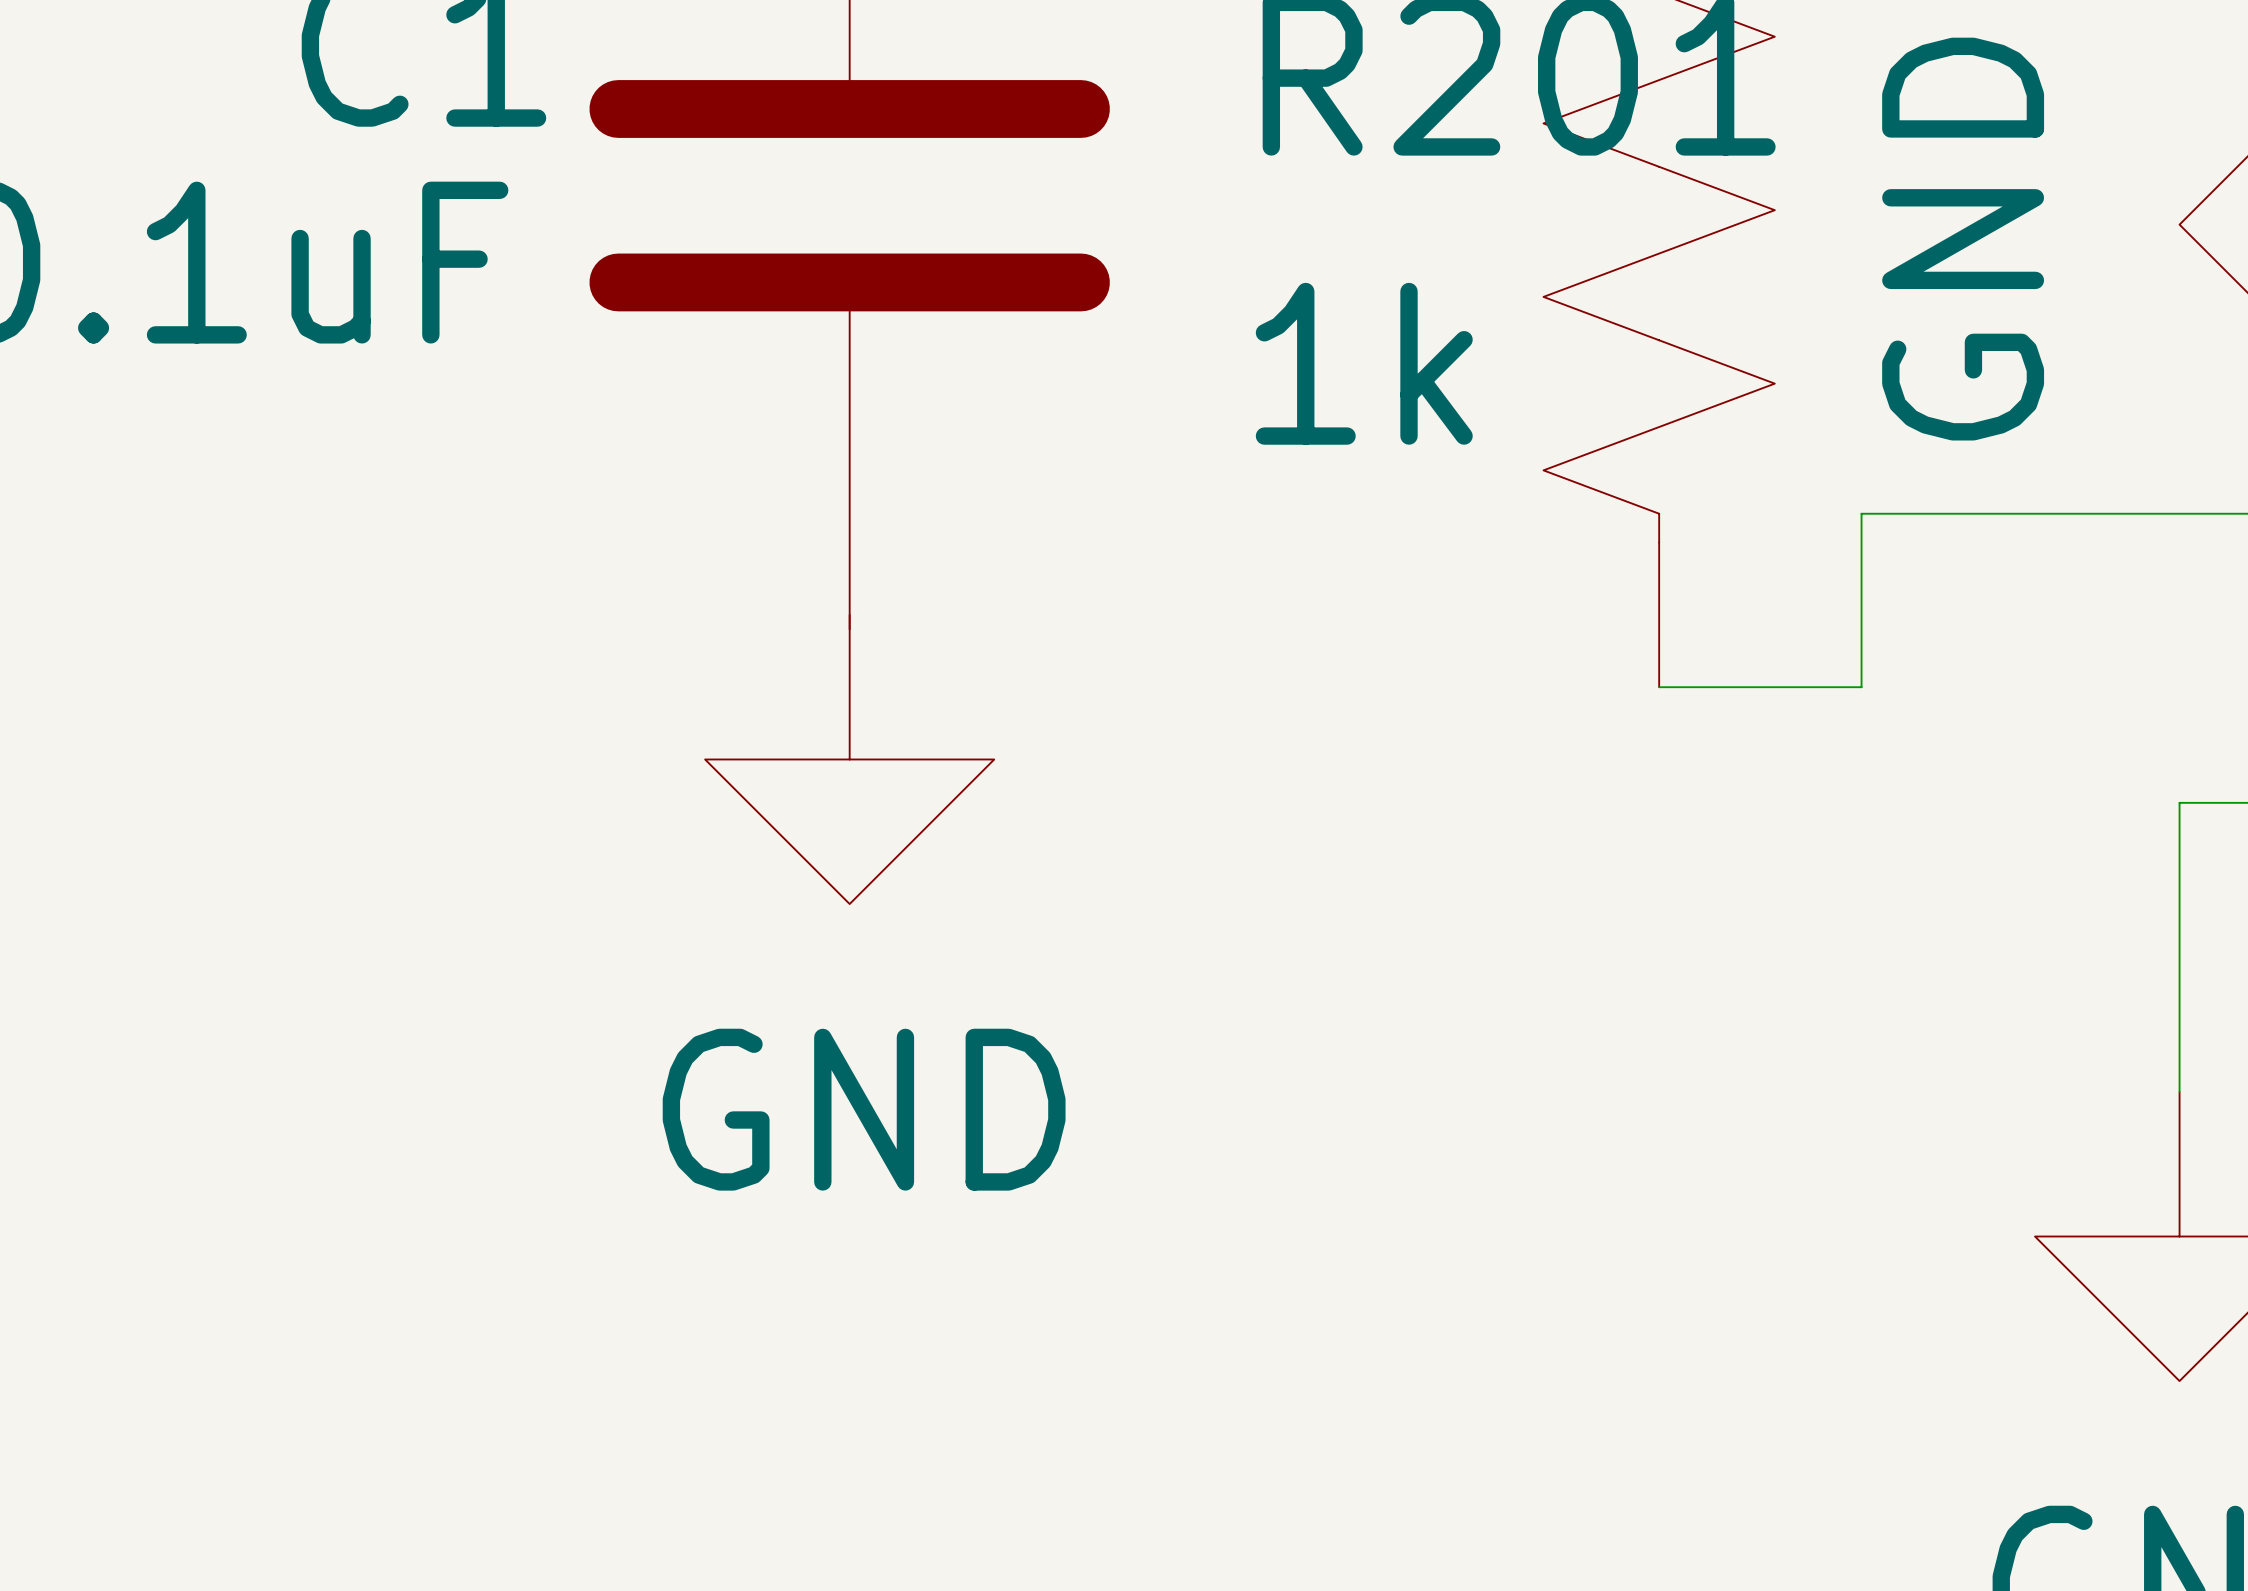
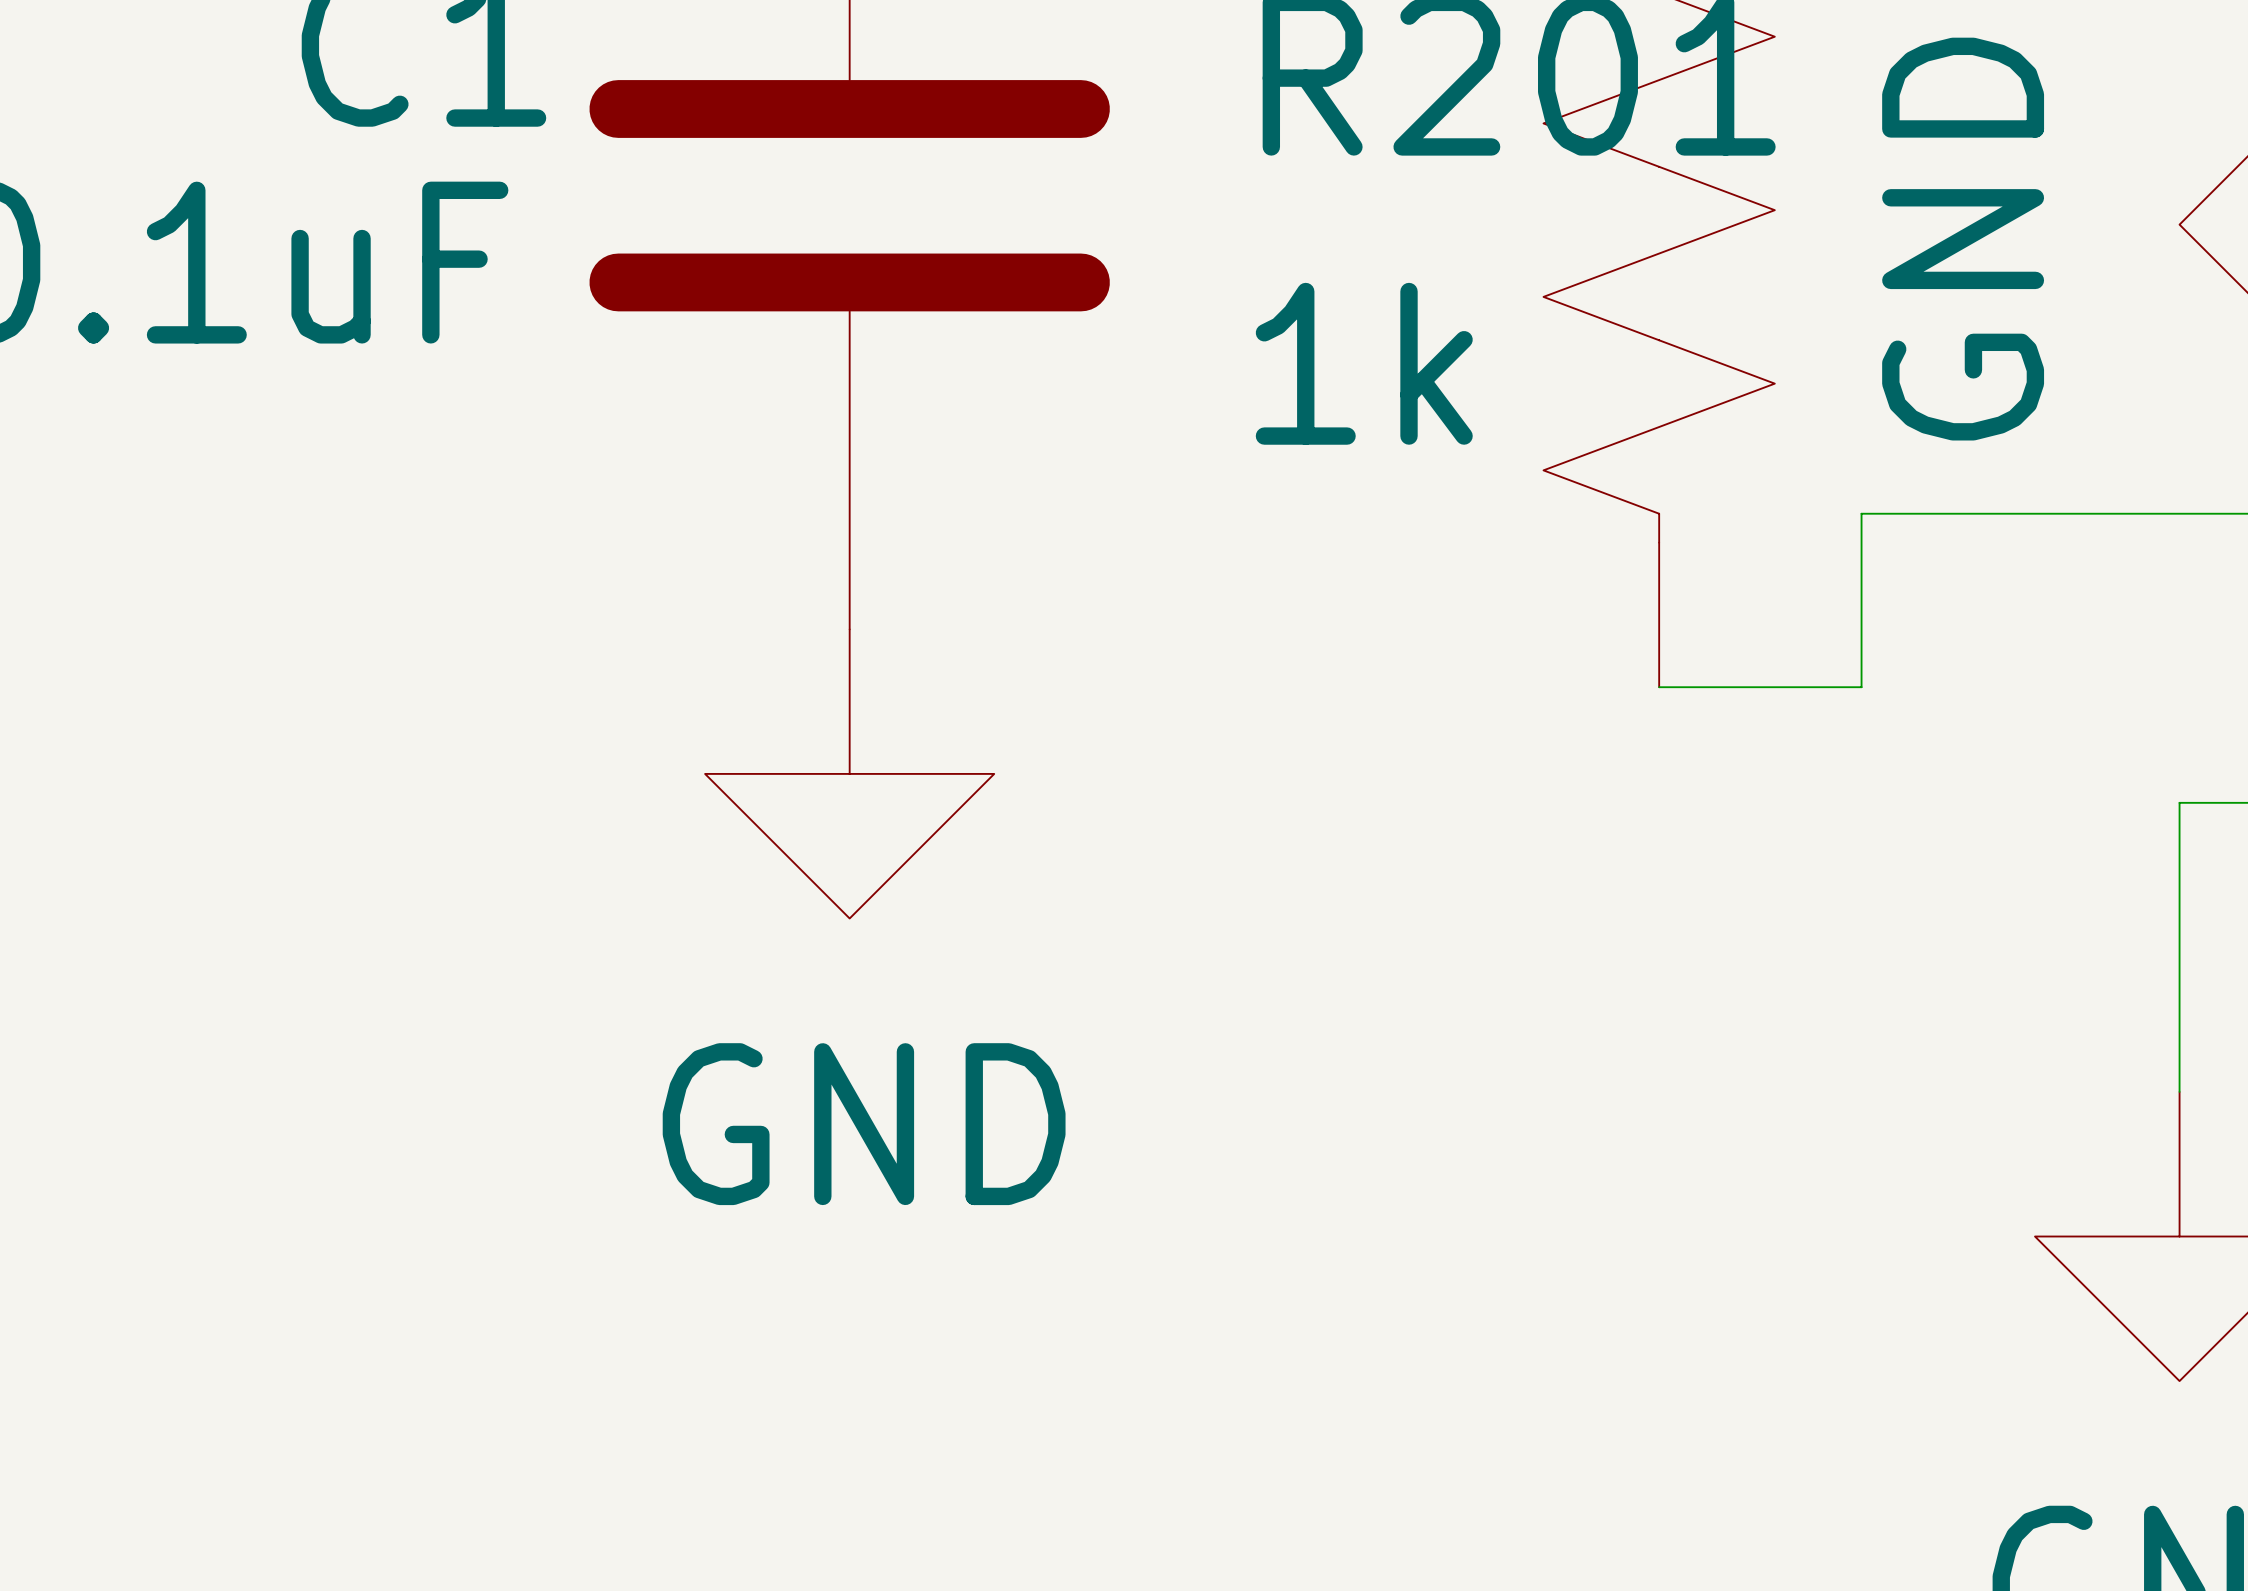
power symbol position: GND (849, 759) -> GND (849, 773)

